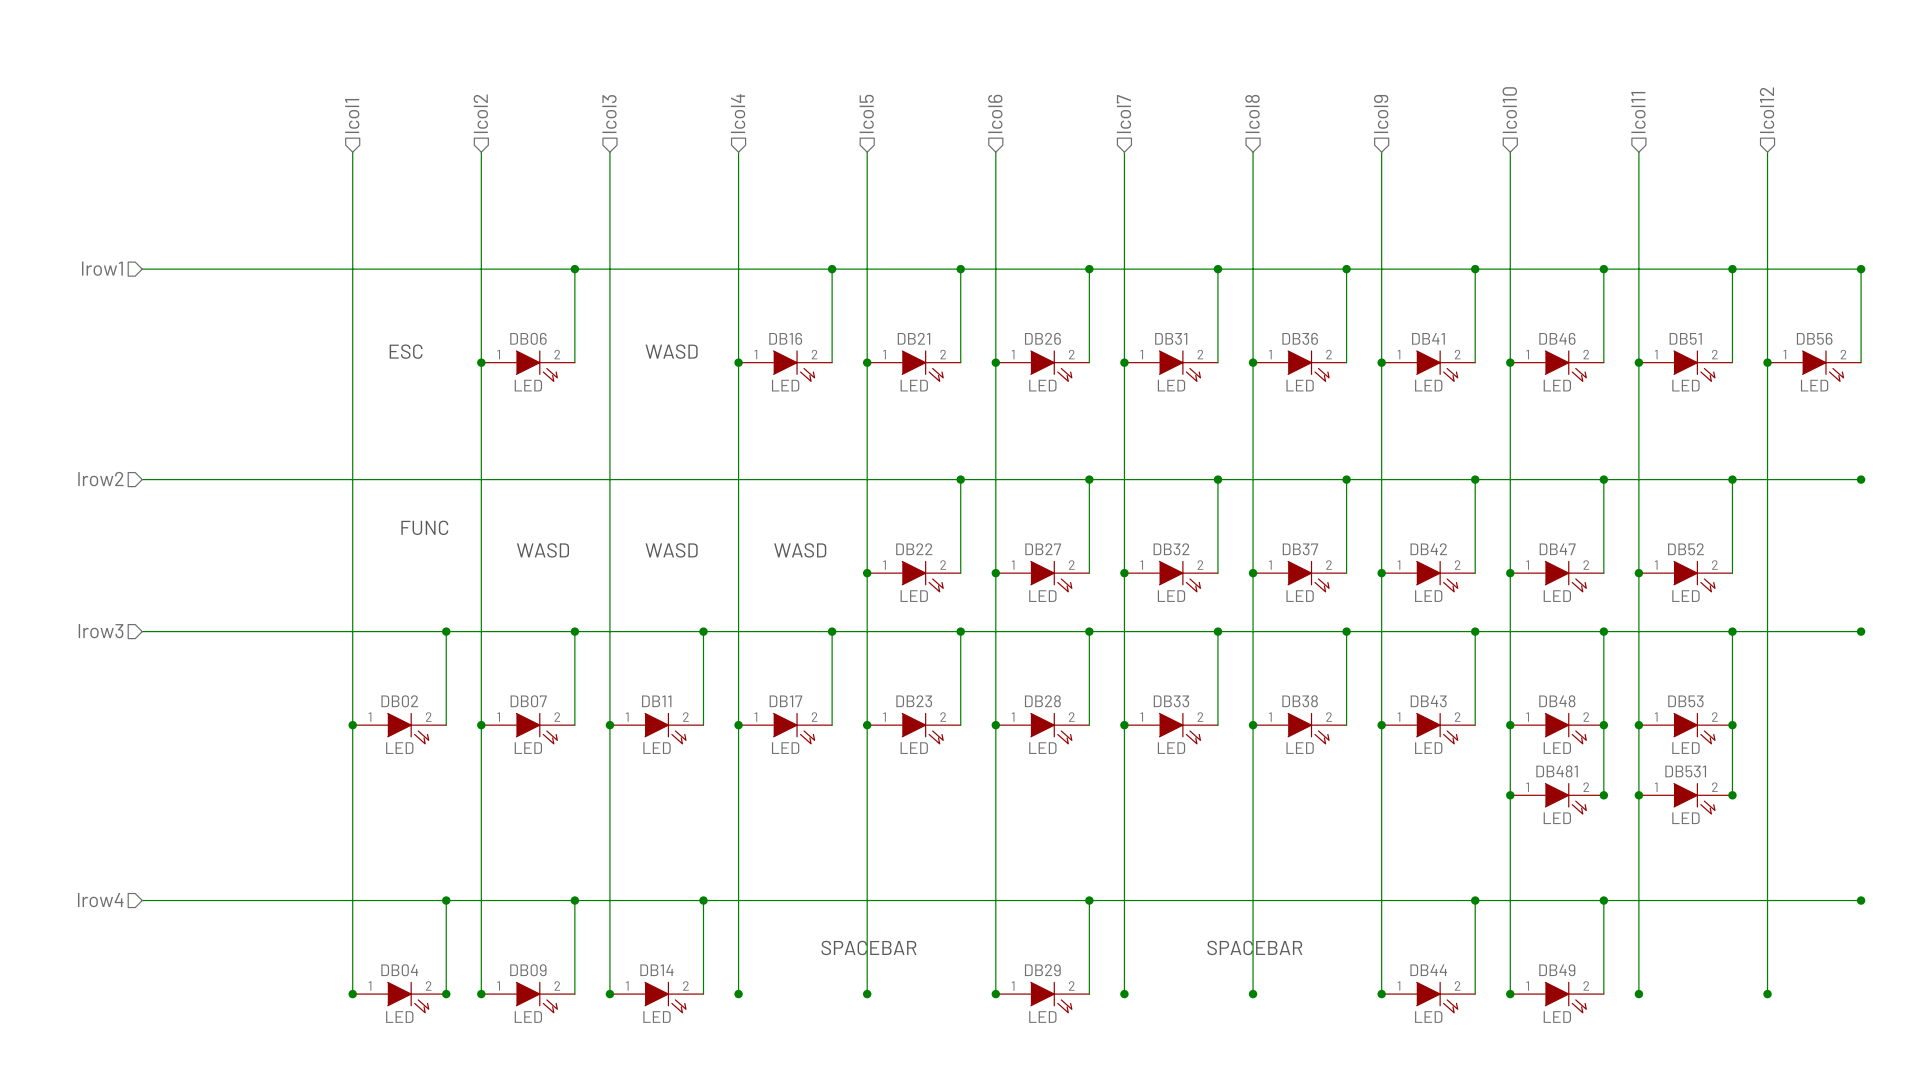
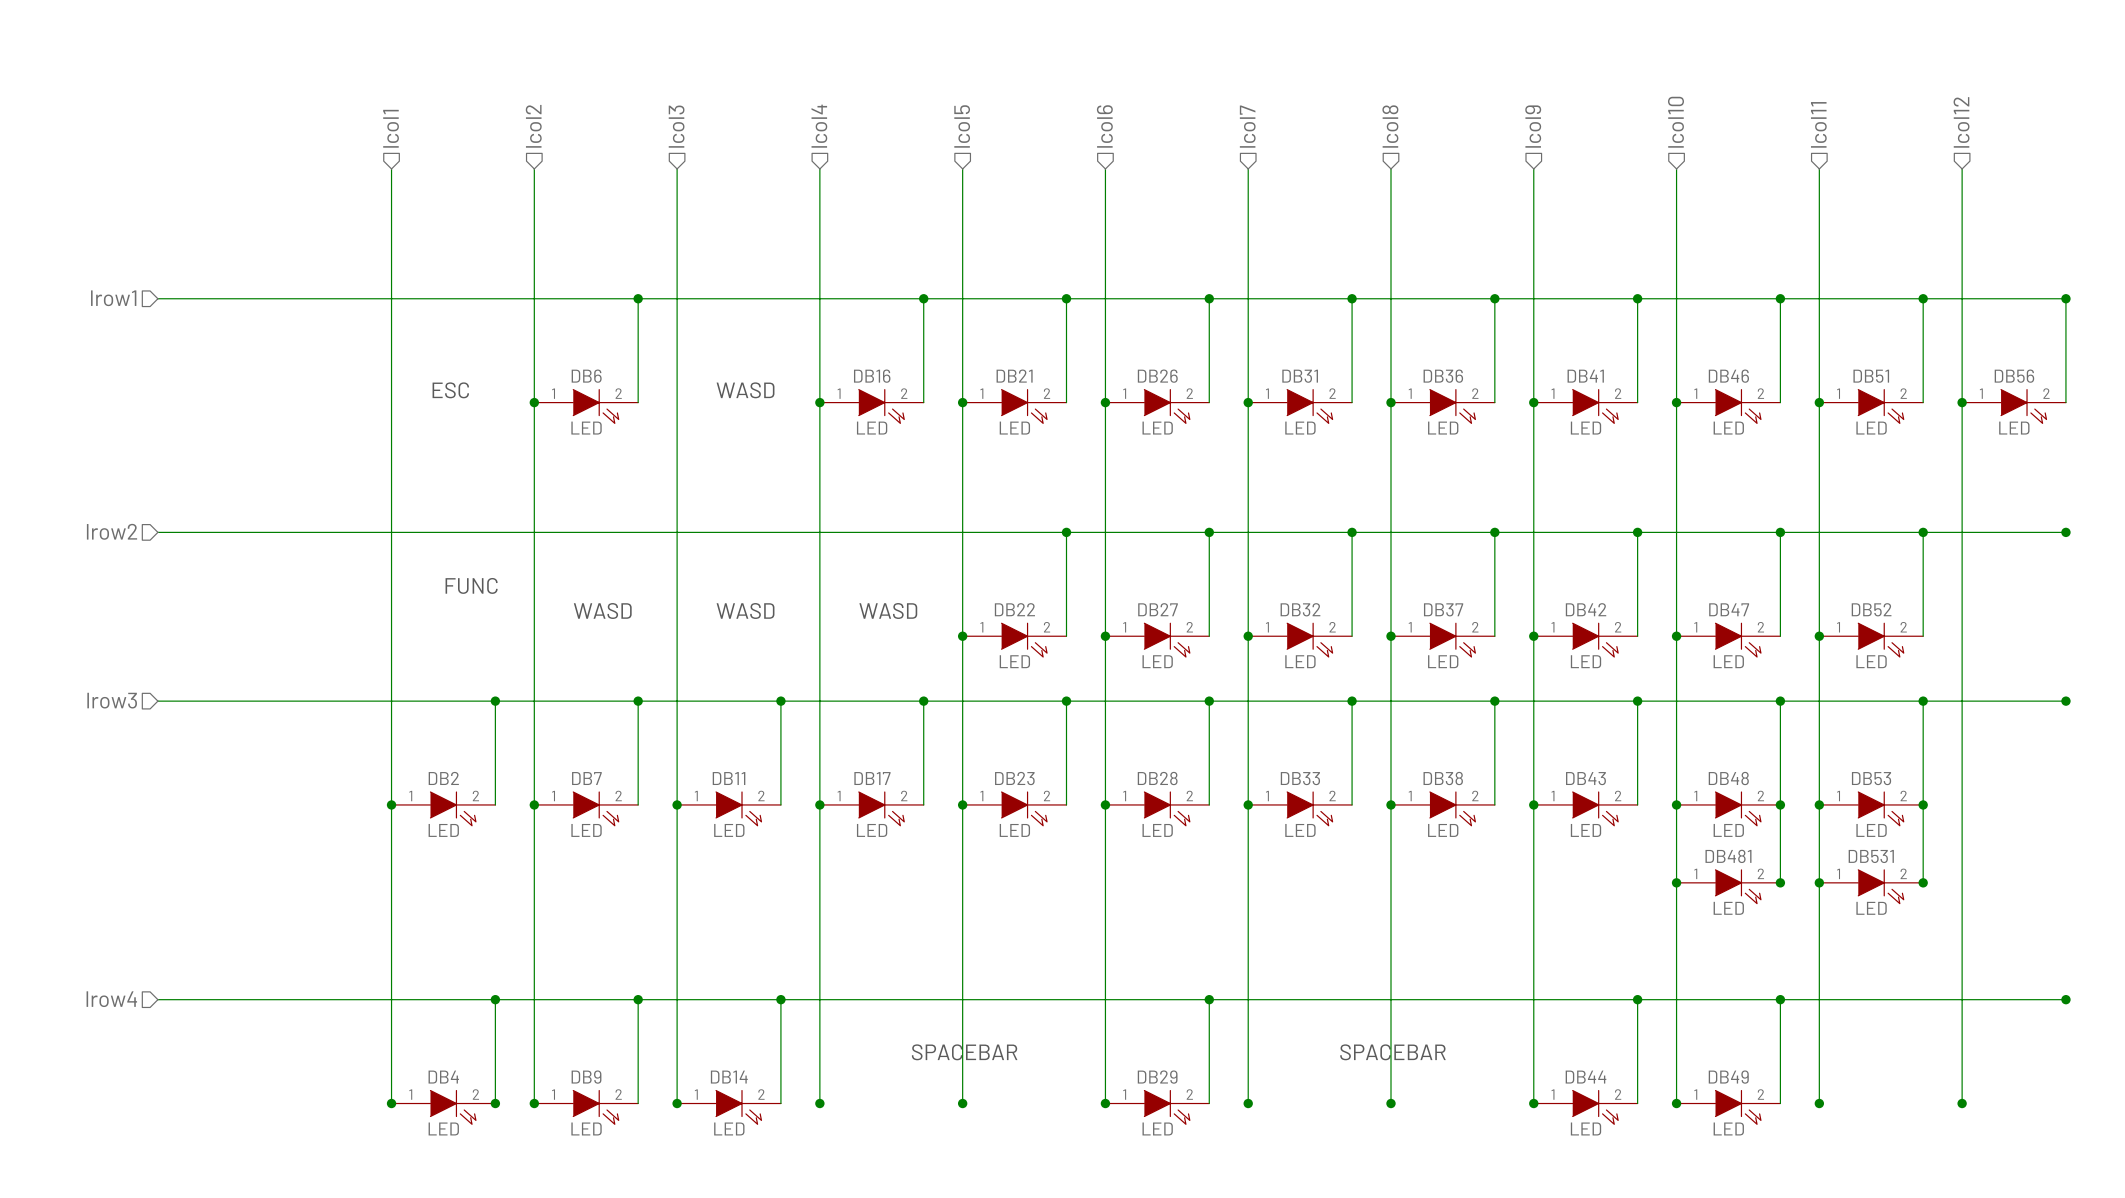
DB06 name: DB06 (528, 338) -> DB6 (586, 376)
DB02 name: DB02 (399, 701) -> DB2 (443, 778)
DB07 name: DB07 (528, 701) -> DB7 (586, 778)
DB04 name: DB04 (399, 970) -> DB4 (443, 1077)
DB09 name: DB09 (528, 970) -> DB9 (586, 1077)

